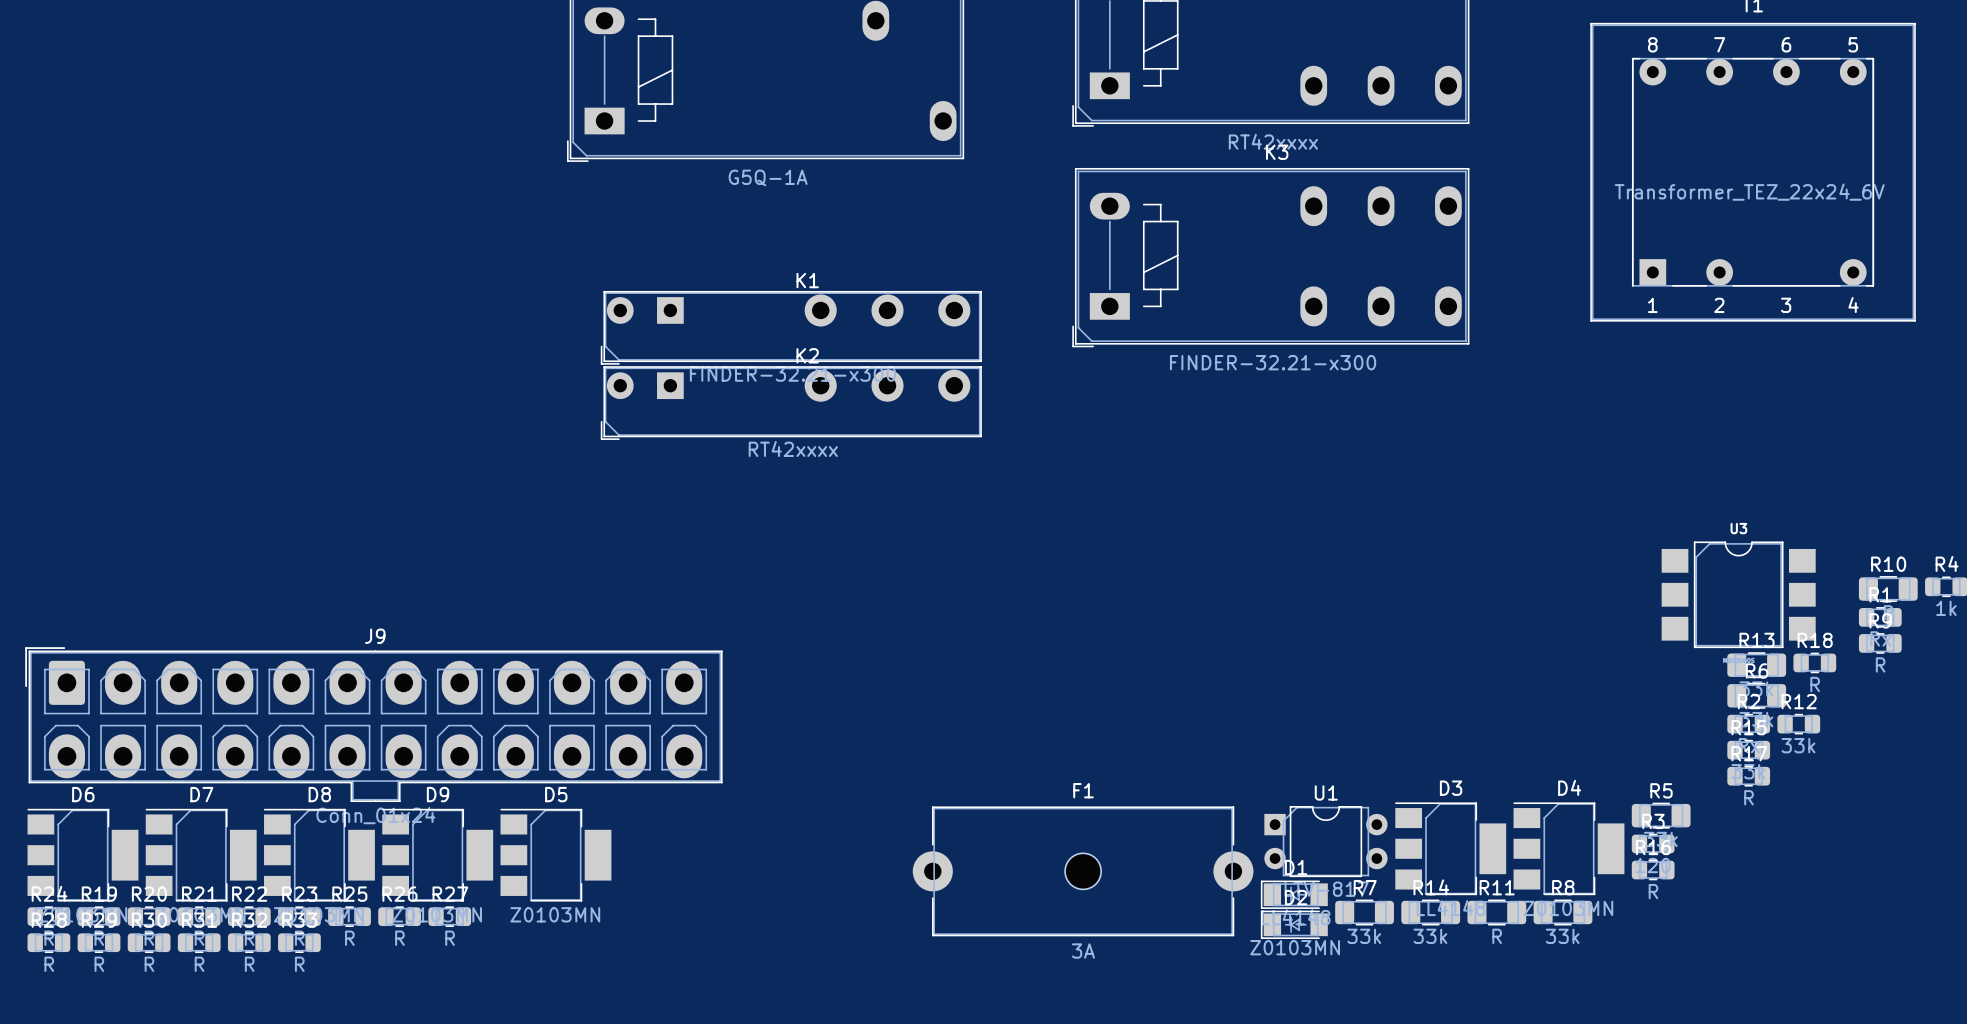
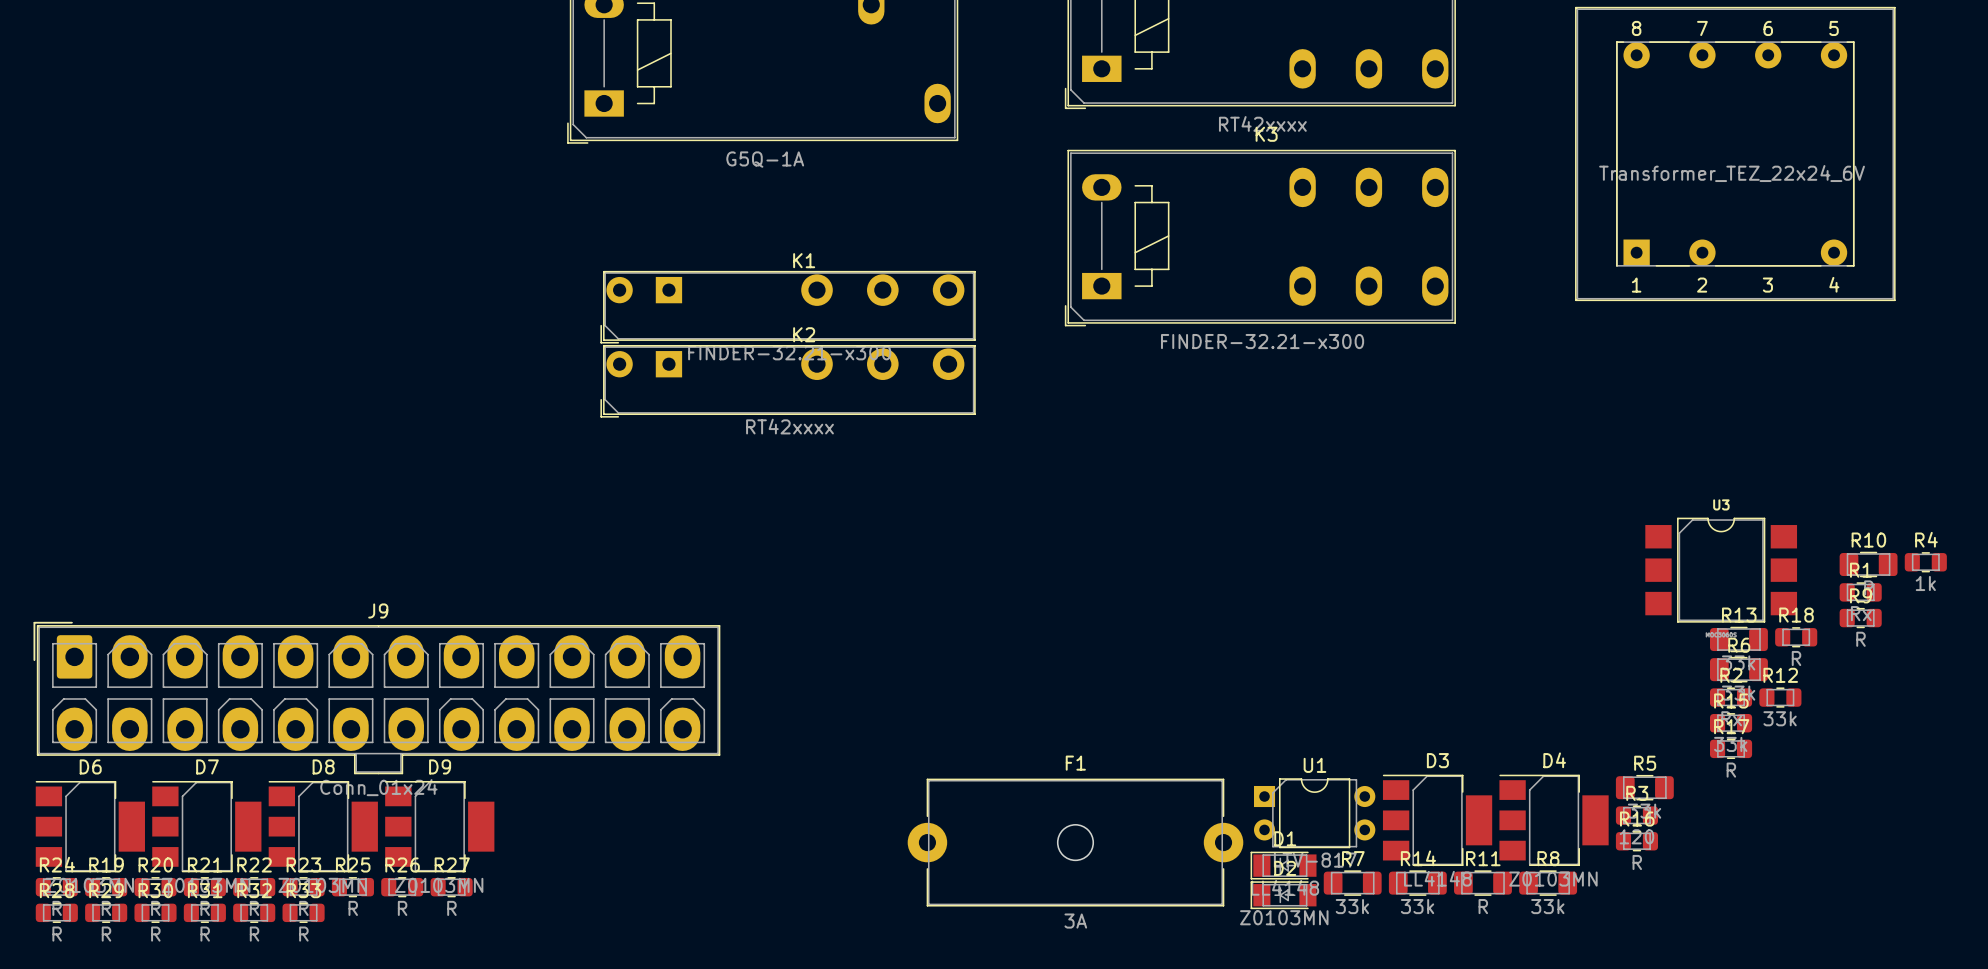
D5: Z0103MN (555, 855) -> none

